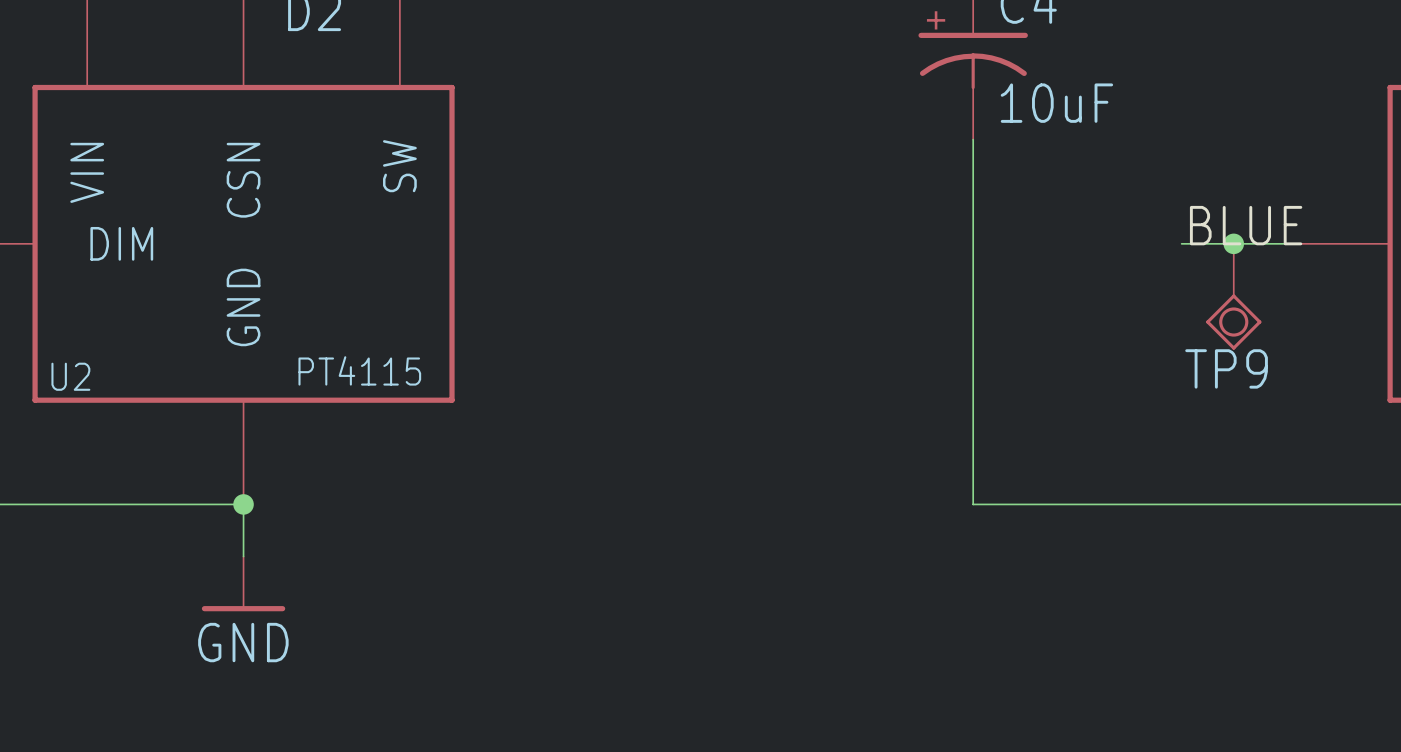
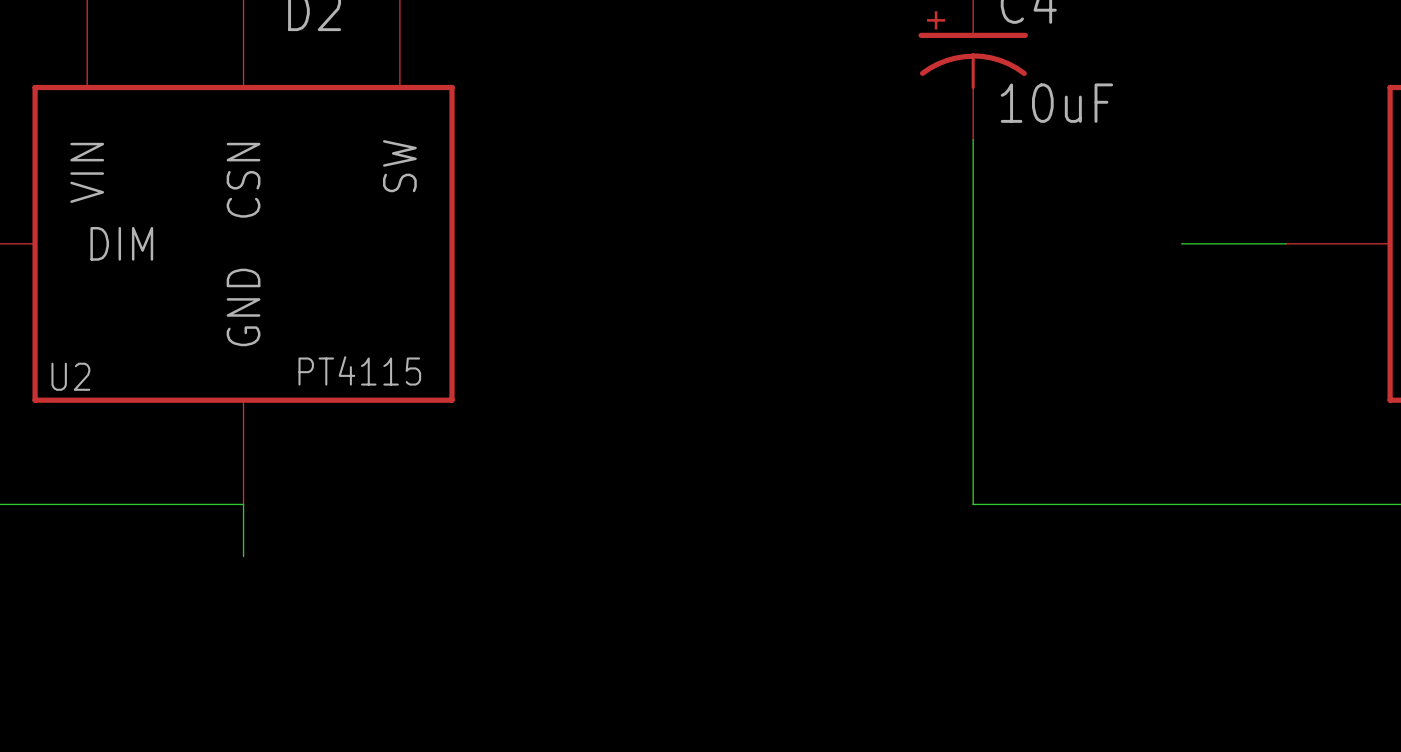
label: BLUE (1246, 225) -> none
junction: (1233, 243) -> none
TP9: (1233, 296) -> none
junction: (243, 504) -> none
power symbol: GND (243, 583) -> none

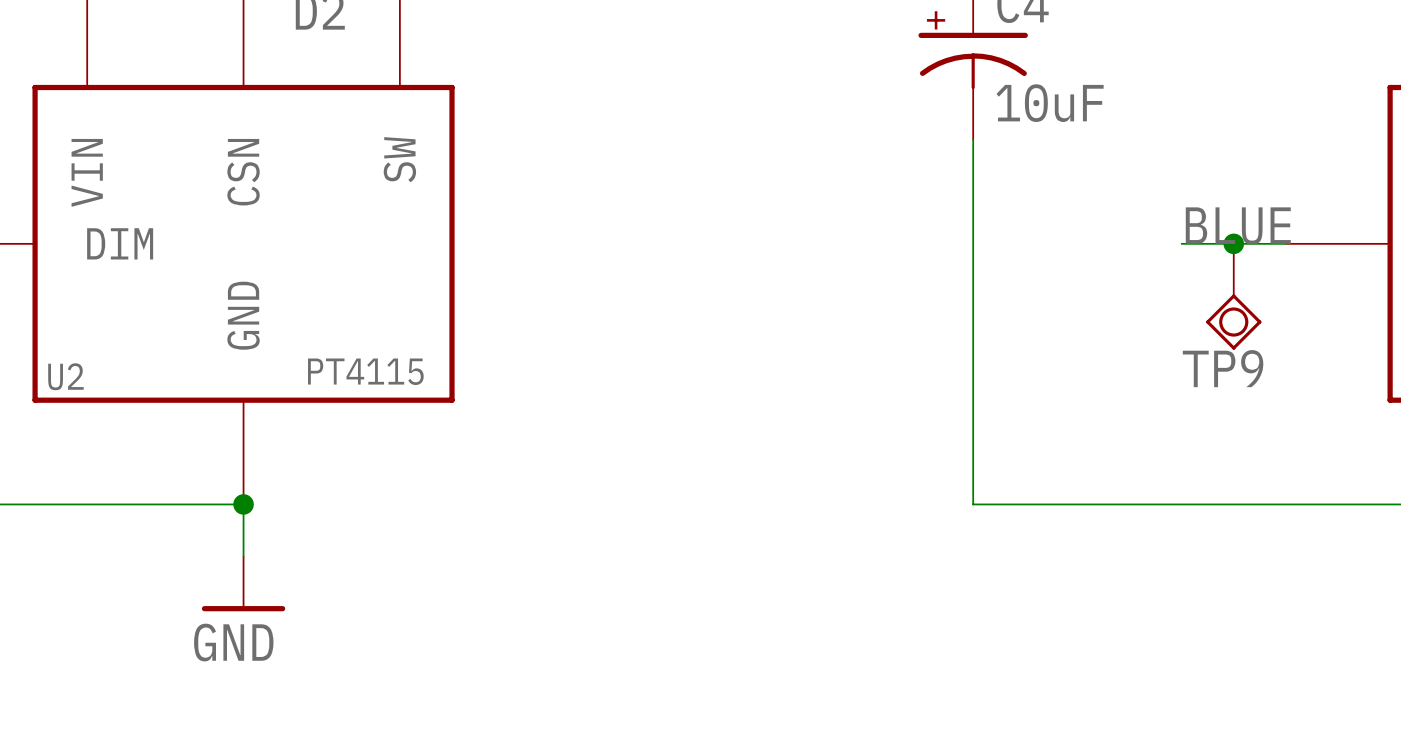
label: none -> BLUE (1238, 225)
junction: none -> (1233, 243)
TP9: none -> (1233, 296)
junction: none -> (243, 504)
power symbol: none -> GND (243, 583)

